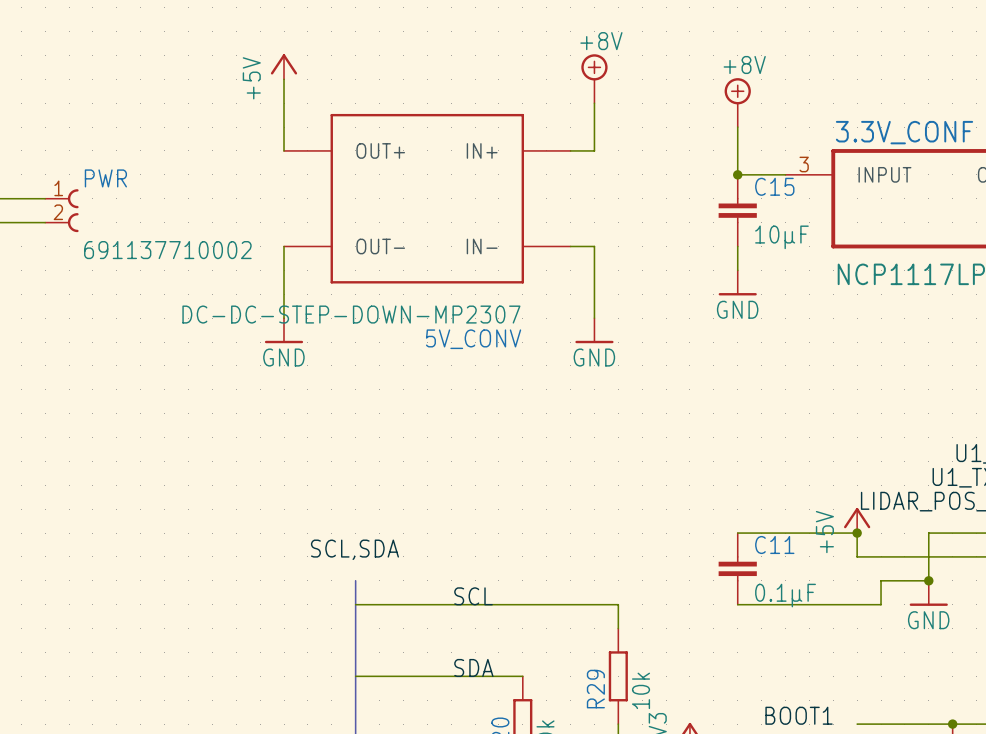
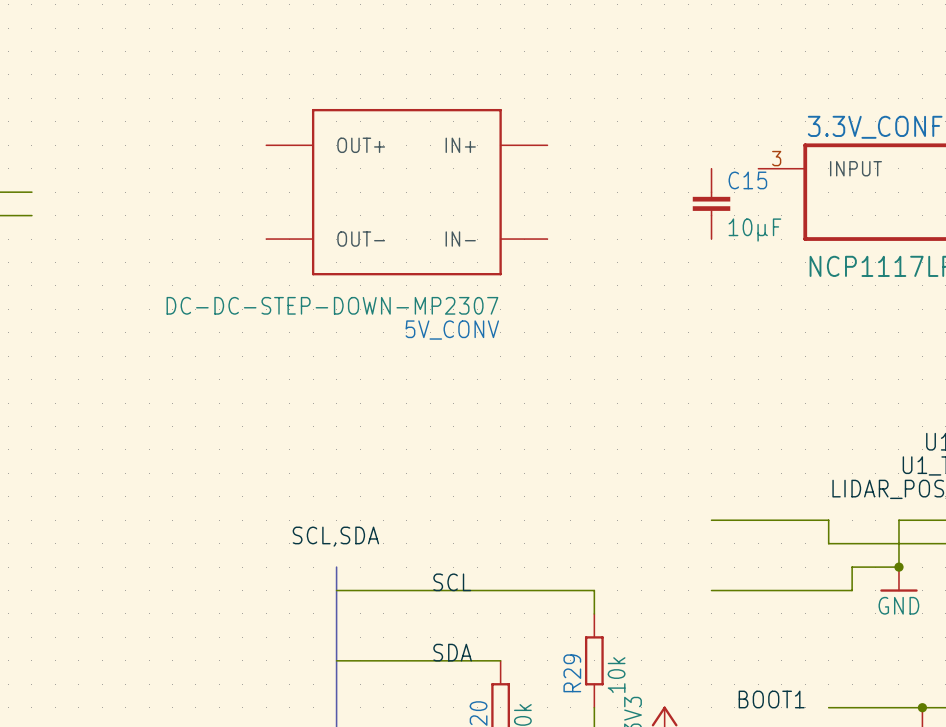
power symbol: +5V (284, 66) -> none
power symbol: +8V (594, 78) -> none
wire: (284, 79) (284, 150) -> none
power symbol: +8V (737, 102) -> none
wire: (594, 103) (594, 150) (570, 150) -> none
wire: (737, 127) (737, 174) (785, 174) -> none
junction: (737, 174) -> none
PWR: 691137710002 (61, 210) -> none
wire: (284, 246) (284, 318) -> none
wire: (570, 246) (594, 246) (594, 318) -> none
wire: (737, 246) (737, 270) -> none
power symbol: GND (737, 282) -> none
power symbol: GND (284, 330) -> none
power symbol: GND (594, 330) -> none
power symbol: +5V (857, 520) -> none
junction: (857, 533) -> none
C11: 0.1µF (737, 568) -> none

